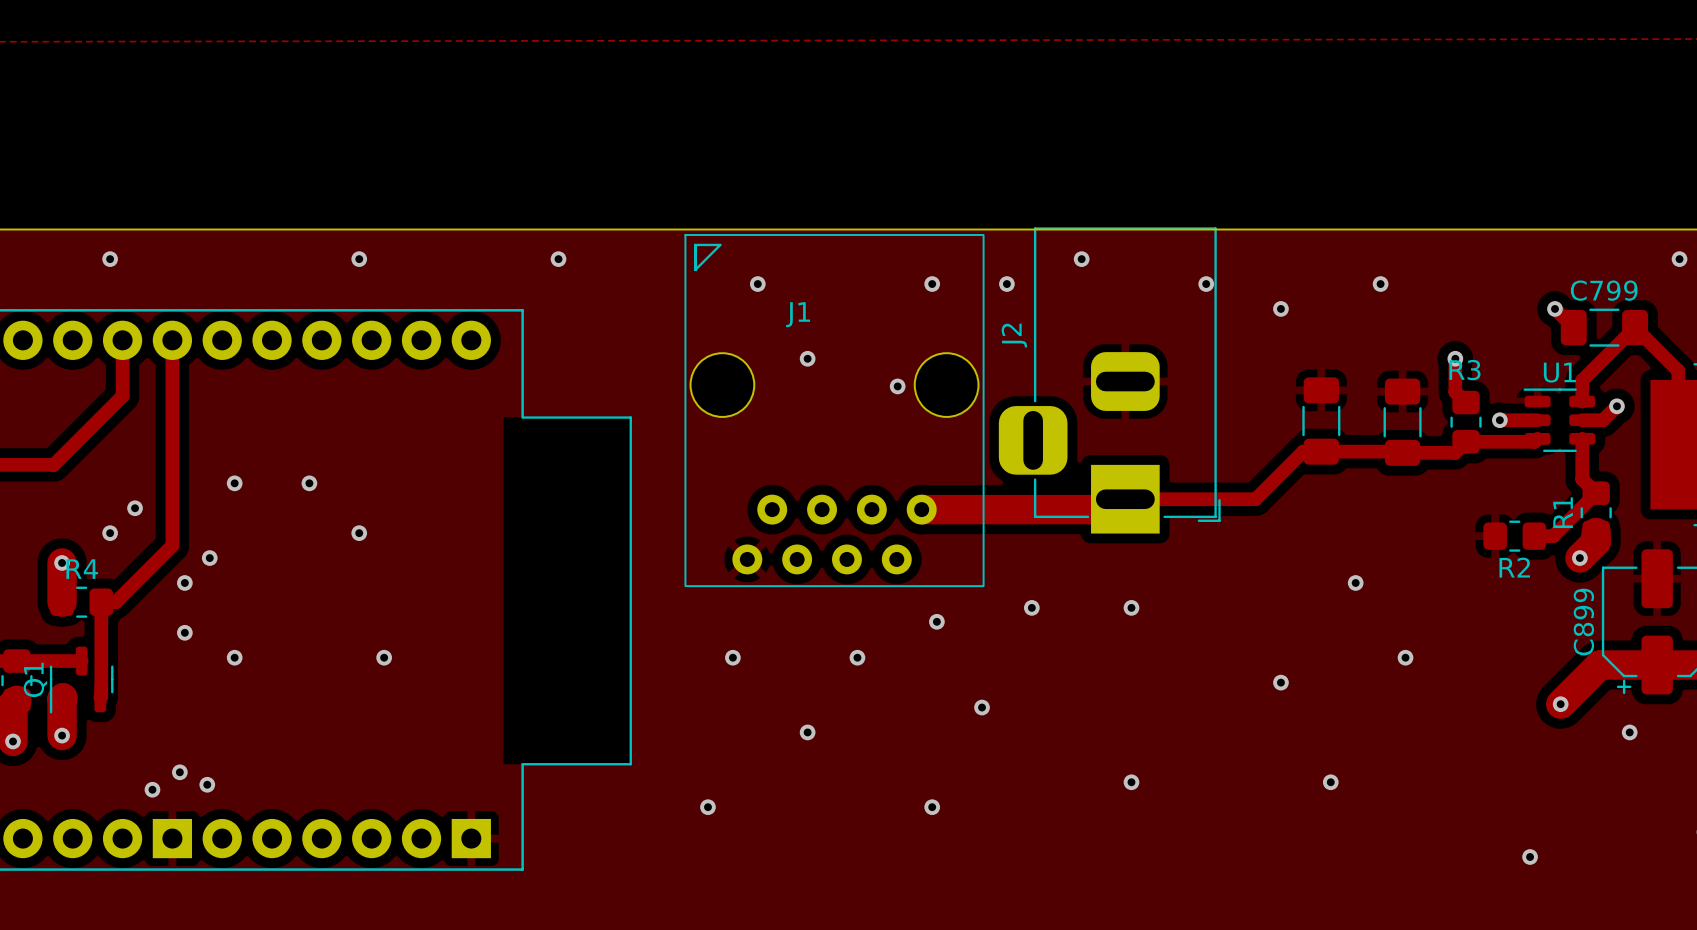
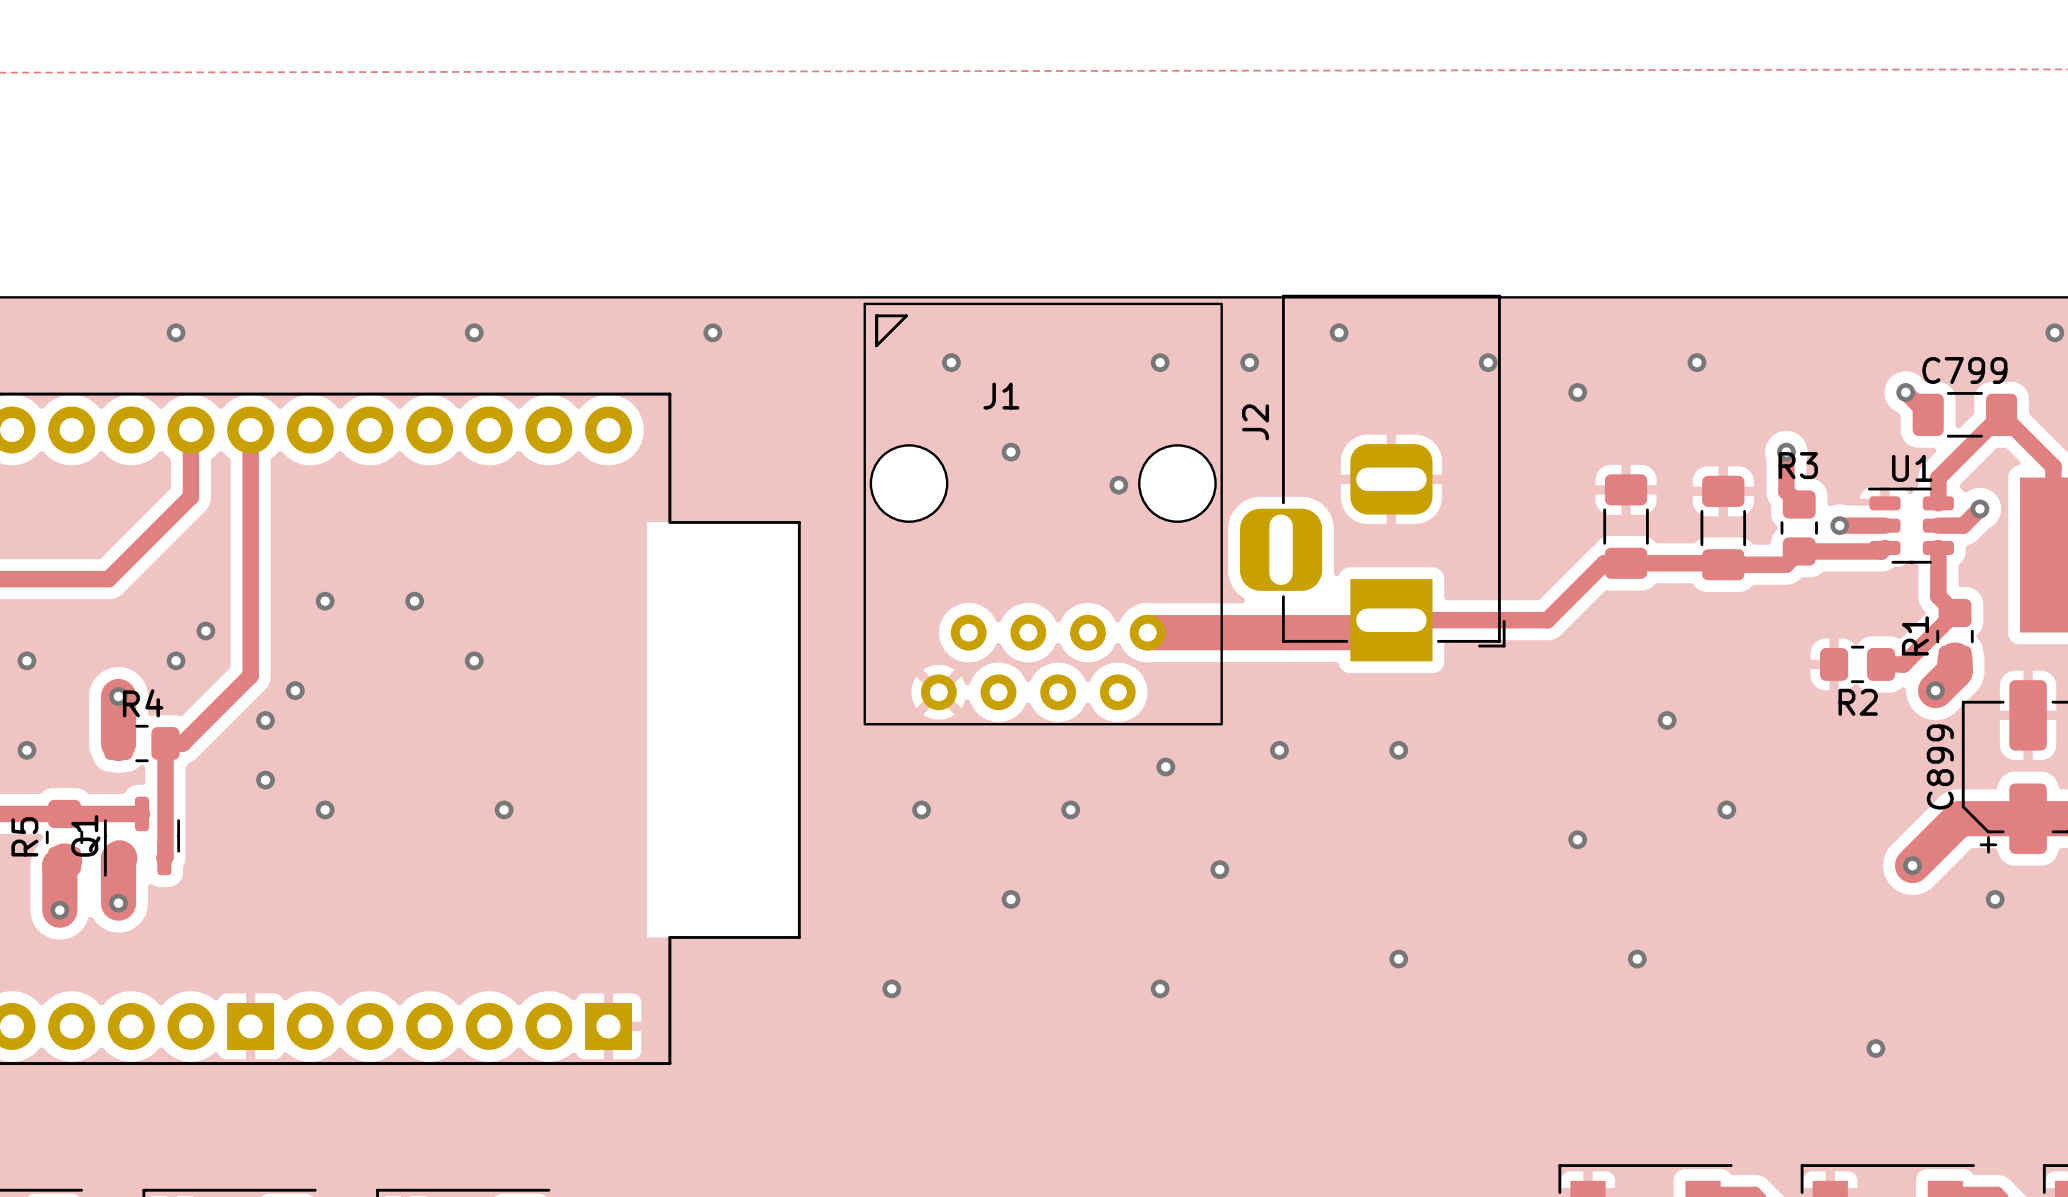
via: (179, 772) -> none
via: (207, 784) -> none
via: (152, 789) -> none

